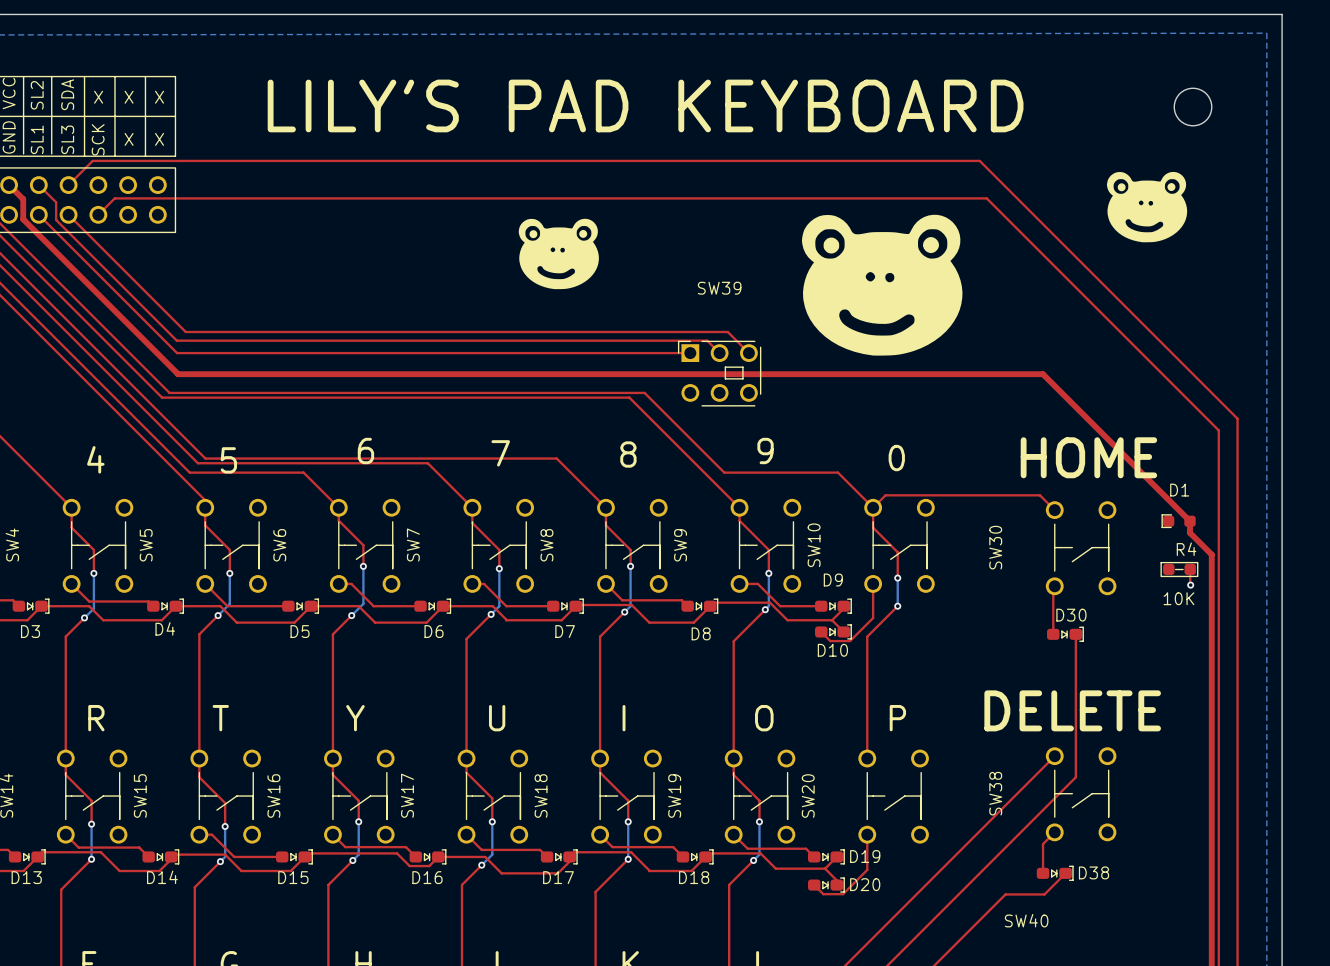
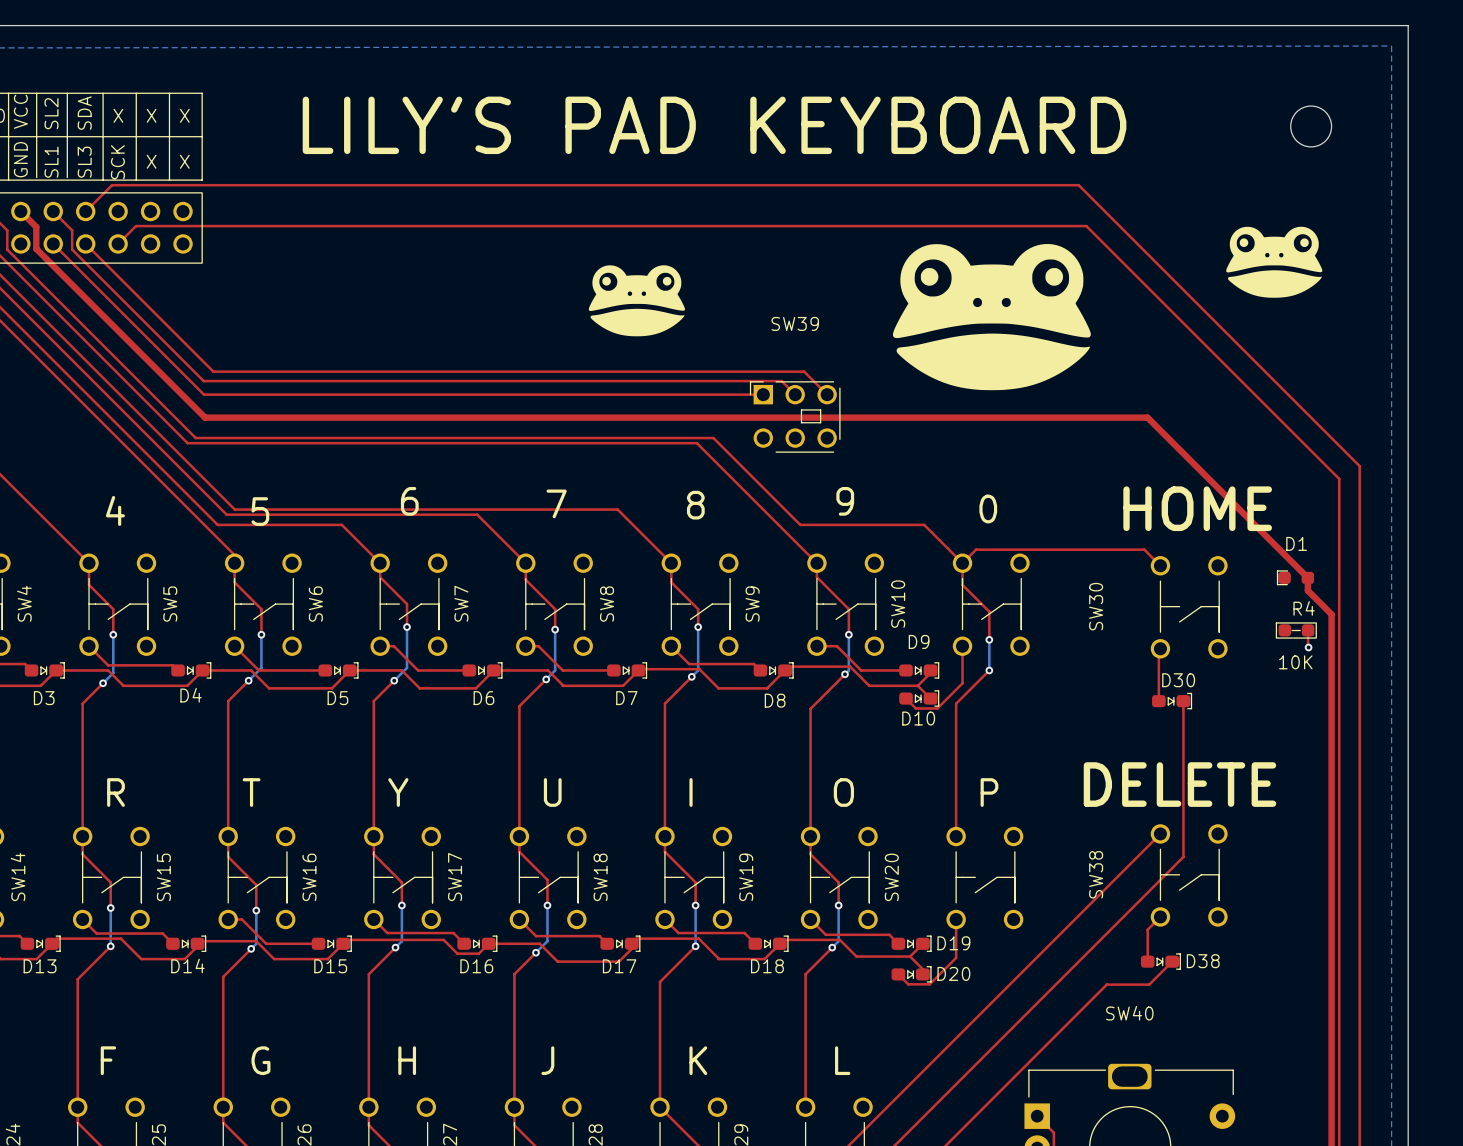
drawing: [1106, 171, 1188, 243] -> none
drawing: none -> [1226, 226, 1323, 298]
drawing: [801, 214, 963, 356] -> none
drawing: none -> [892, 244, 1091, 391]
drawing: [518, 218, 599, 290] -> none
drawing: none -> [588, 265, 685, 337]

